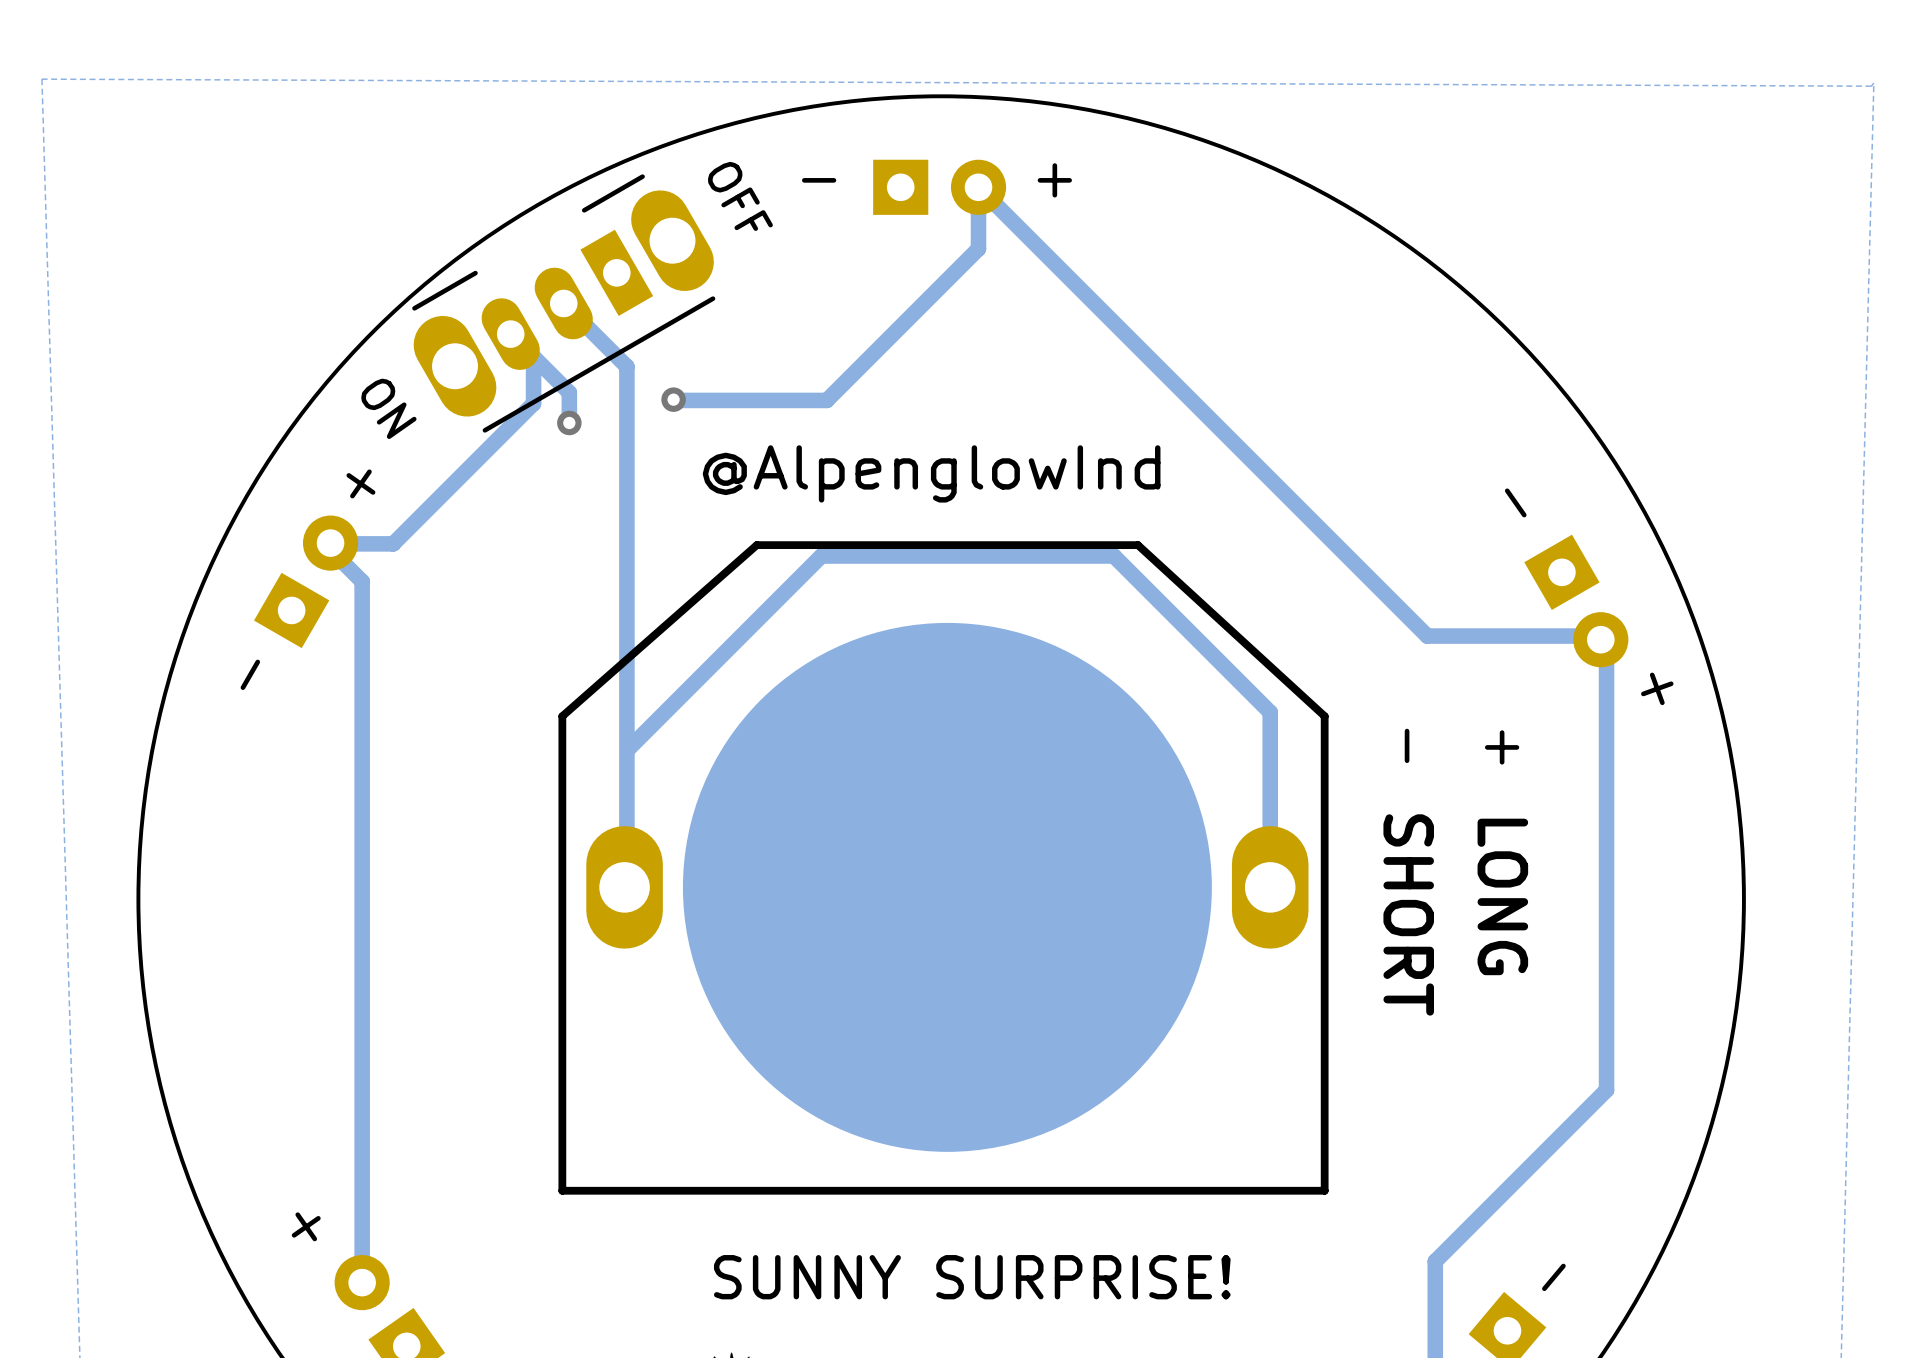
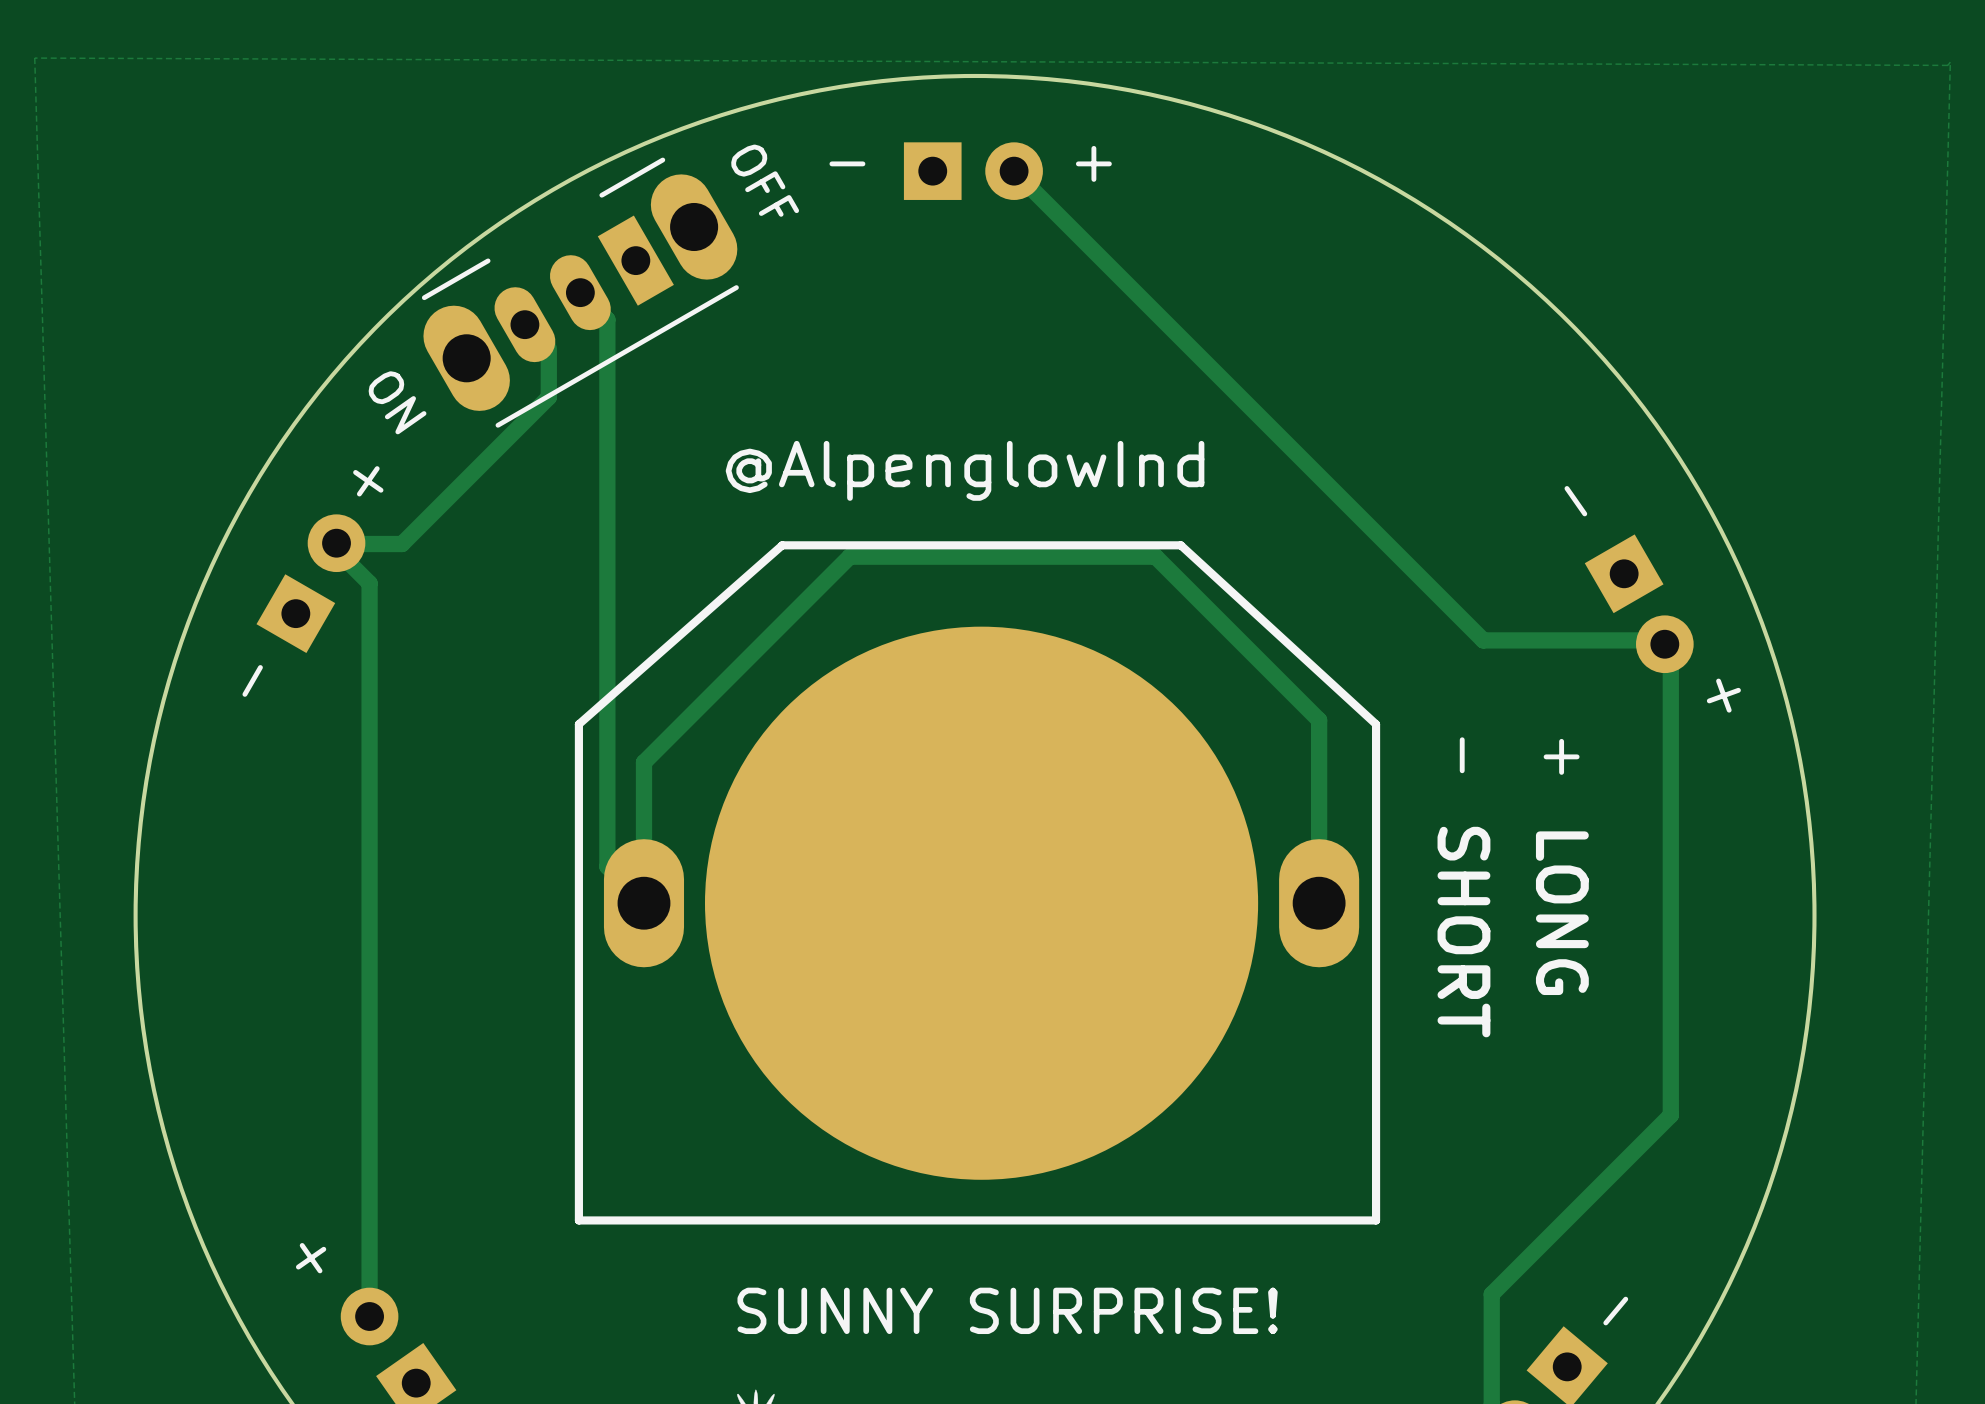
track: (978, 187) (978, 248) (826, 400) (673, 399) -> none
track: (589, 329) (626, 366) (626, 885) (624, 887) -> (607, 319) (607, 866) (643, 903) (643, 762) (647, 759)
track: (510, 334) (569, 392) (569, 422) -> none
via: (673, 399) -> none
via: (569, 422) -> none

